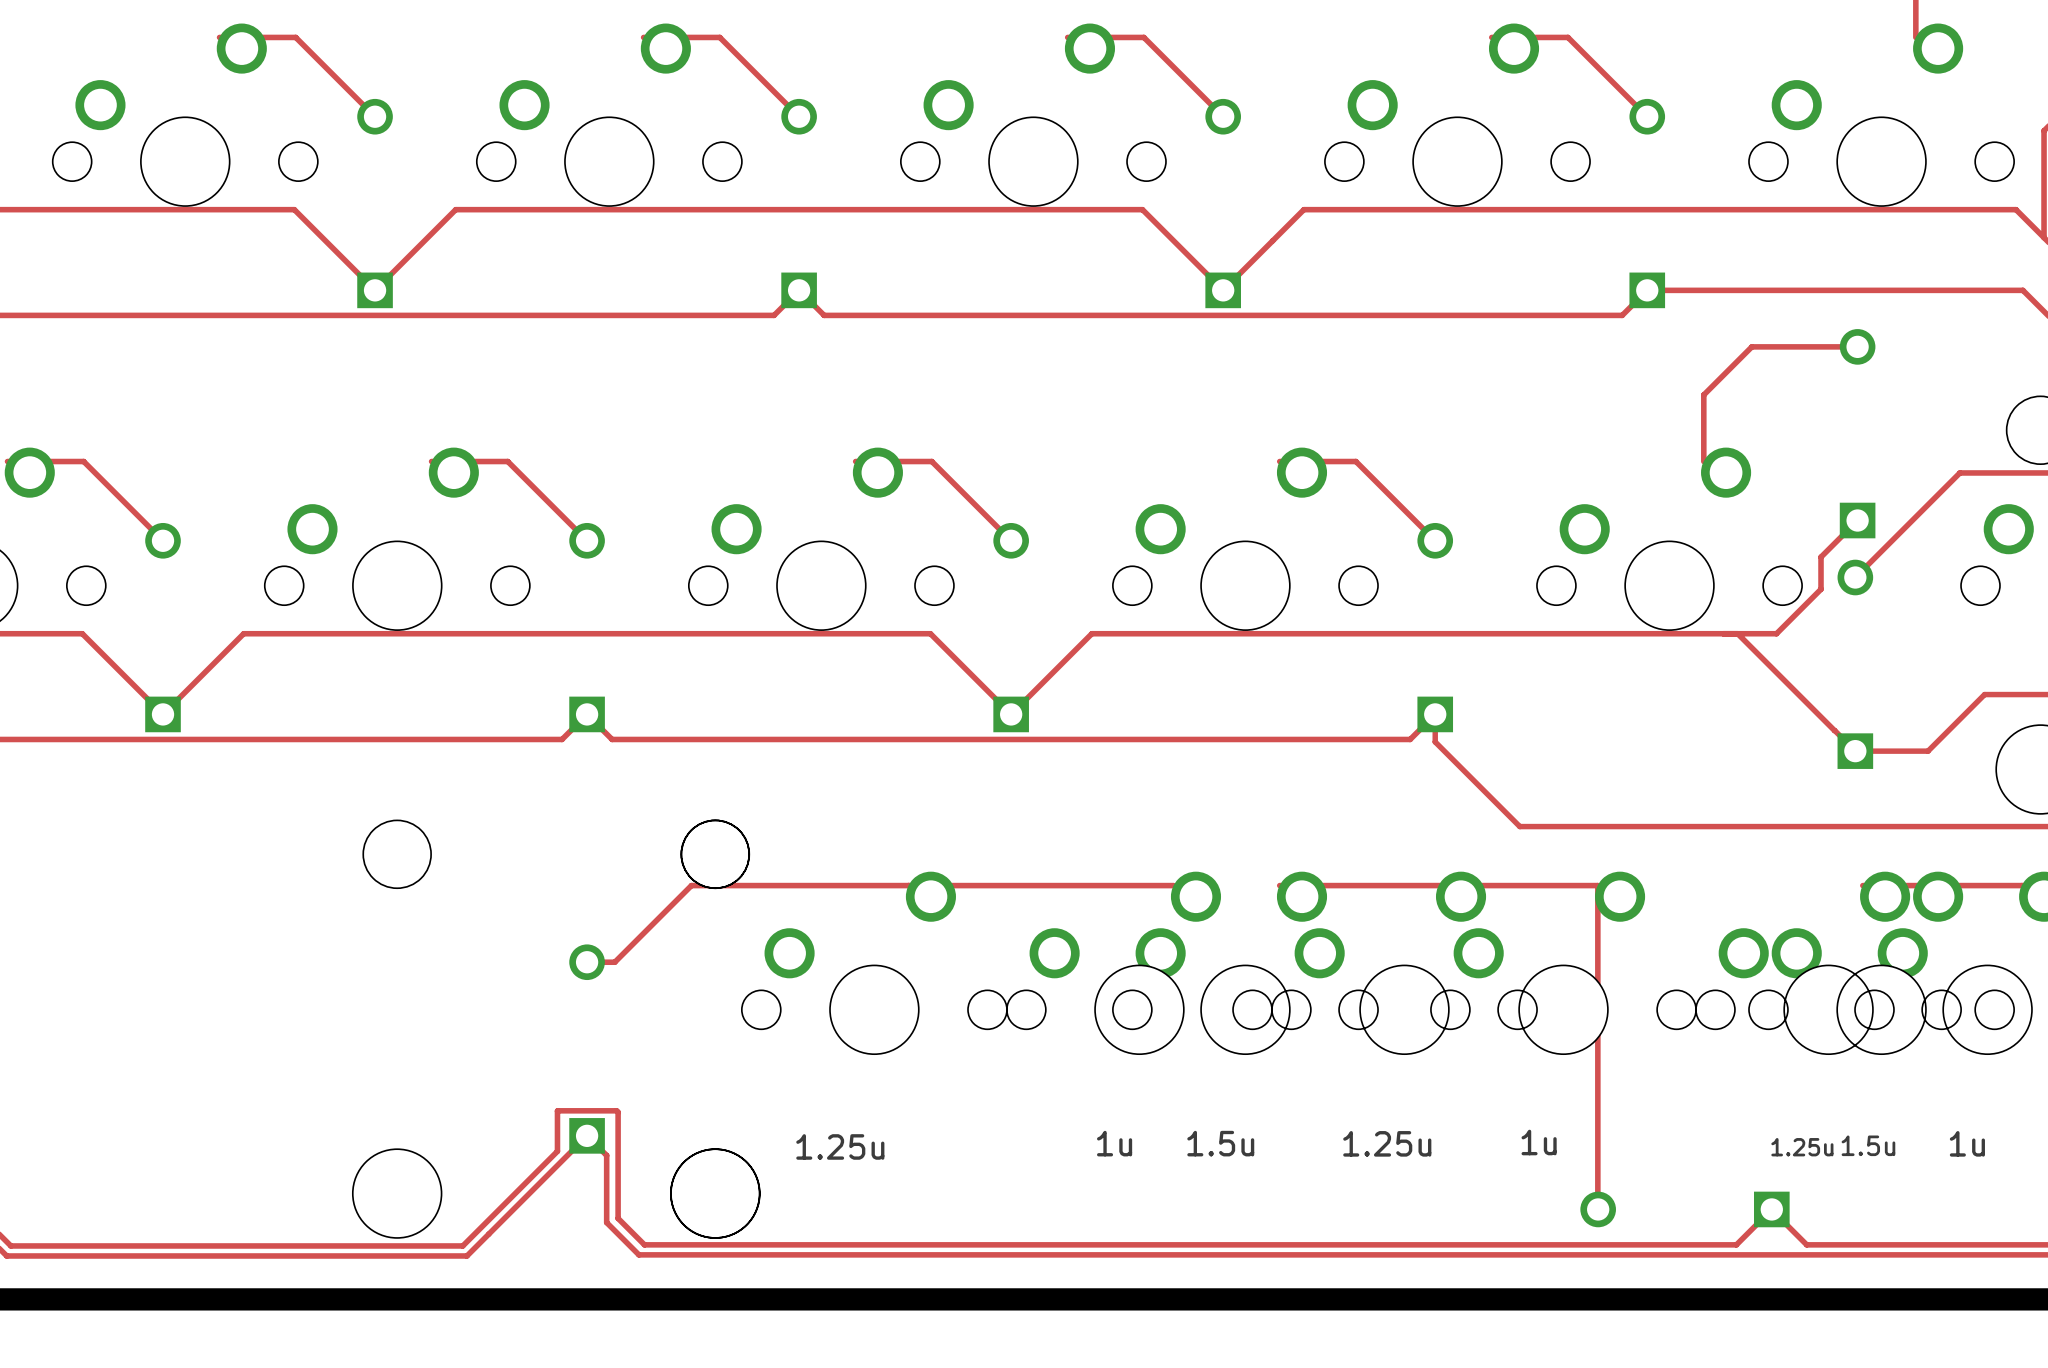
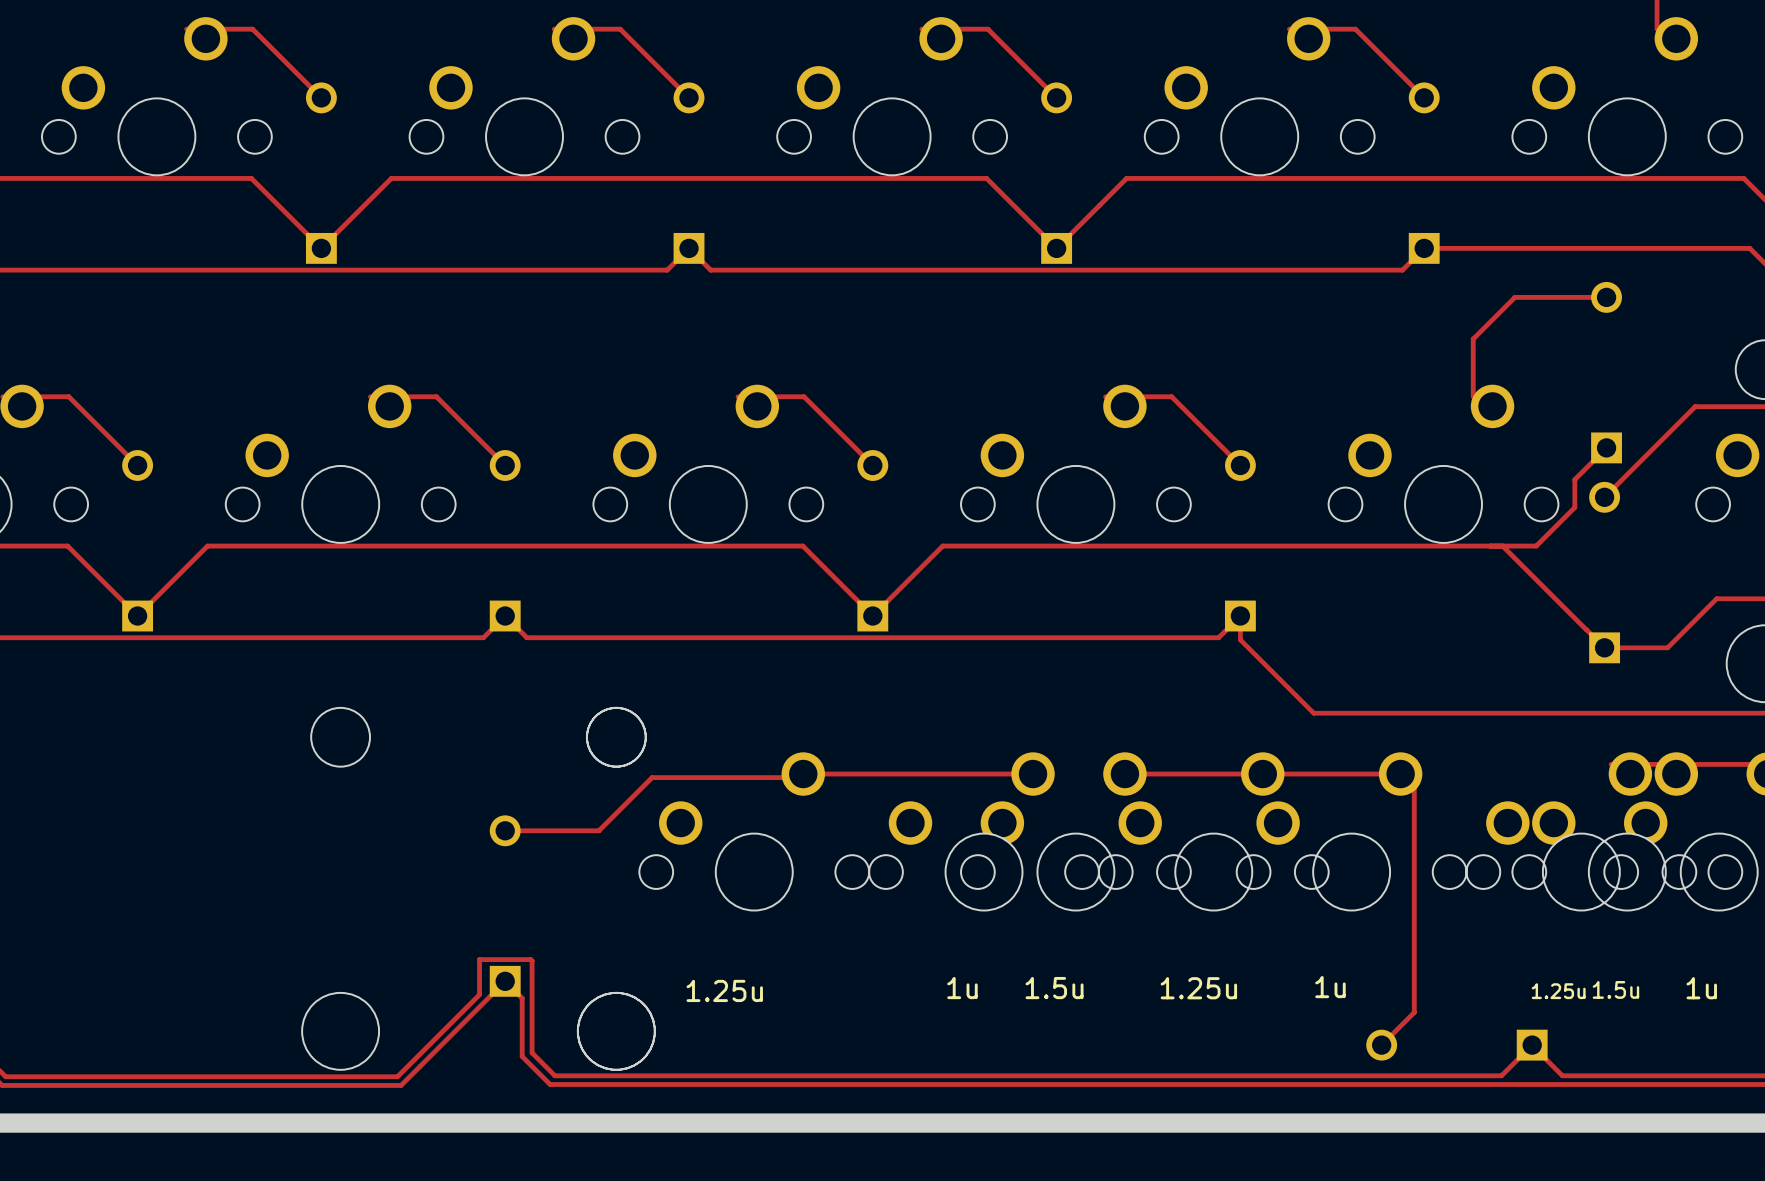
track: (1173, 885) (691, 885) (614, 962) -> (797, 780) (794, 777) (652, 777) (598, 830) (529, 830)
track: (1279, 885) (1597, 885) (1597, 1209) -> (1124, 774) (1400, 774) (1414, 787) (1414, 1012) (1381, 1045)
track: none -> (803, 774) (1033, 774)

